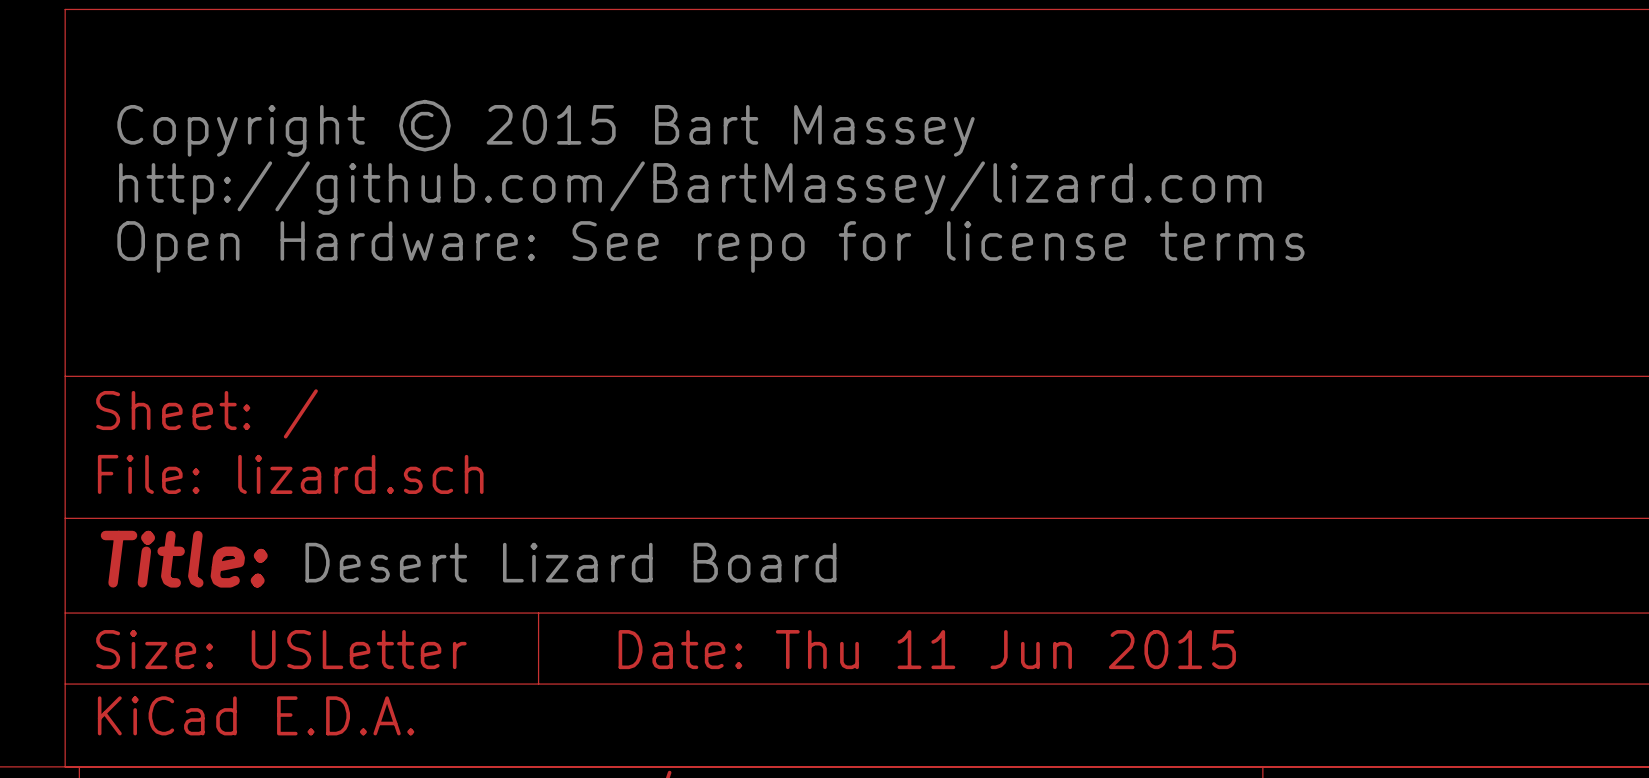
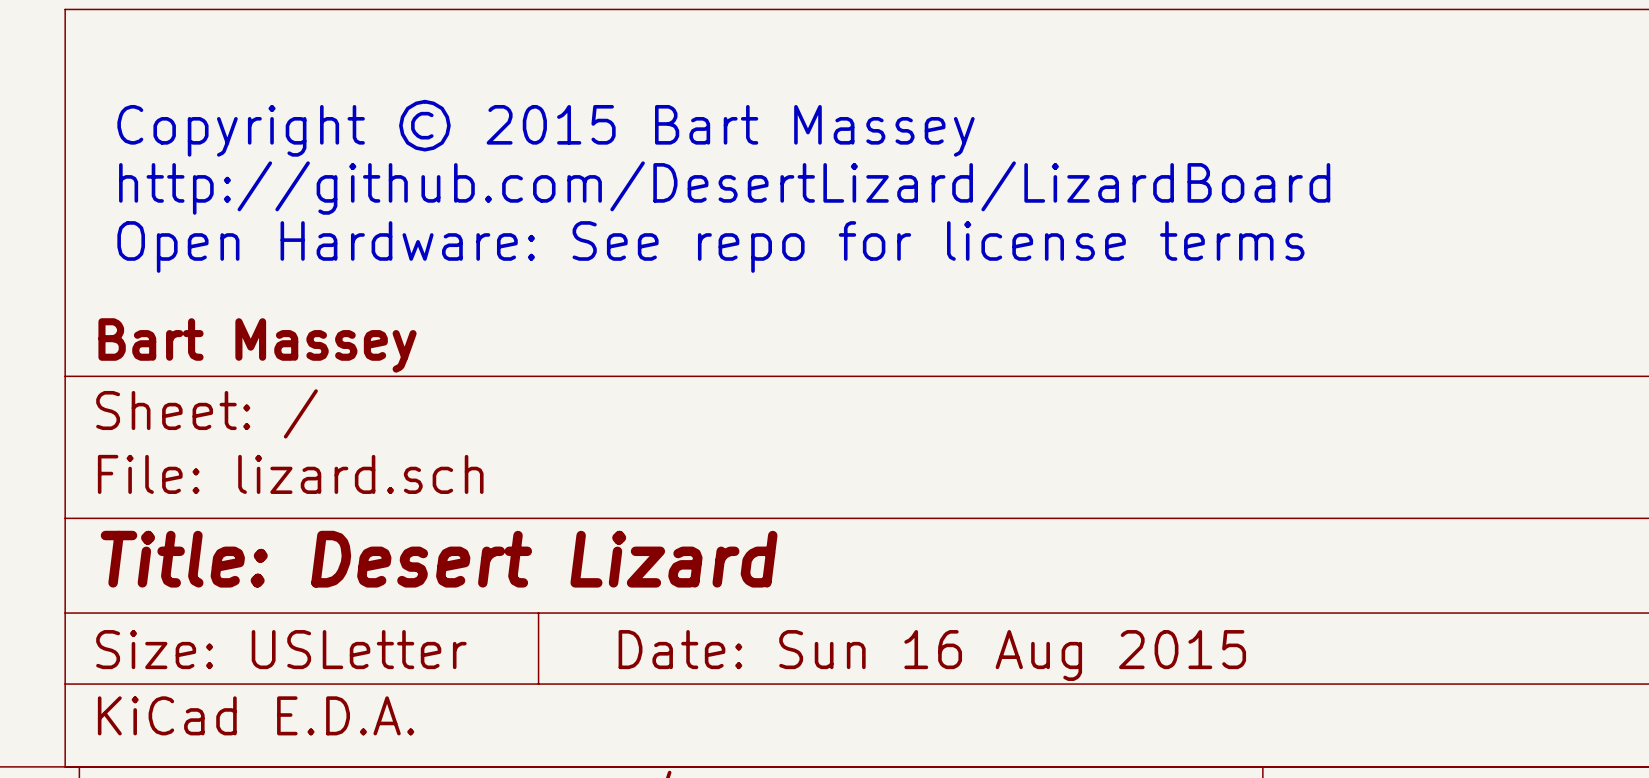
text: http://github.com/BartMassey/lizard.com (690, 188) -> http://github.com/DesertLizard/LizardBoard (724, 188)
title block: none -> Bart Massey (257, 345)
title block: Title: (184, 559) -> Title: Desert Lizard (439, 559)
text: Desert Lizard Board (570, 562) -> none
title block: Date: Thu 11 Jun 2015 (927, 649) -> Date: Sun 16 Aug 2015 (932, 655)

